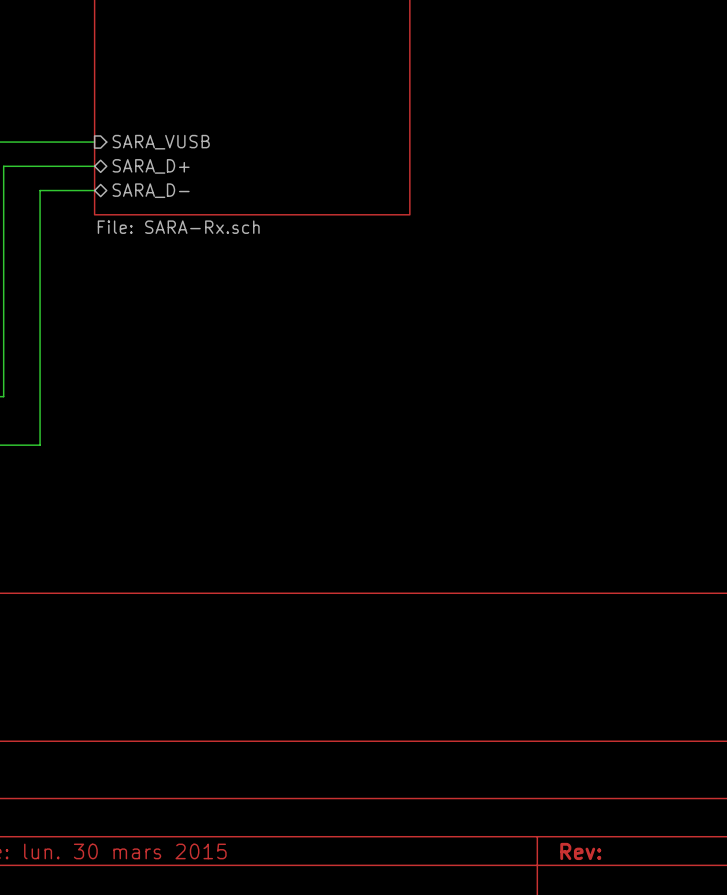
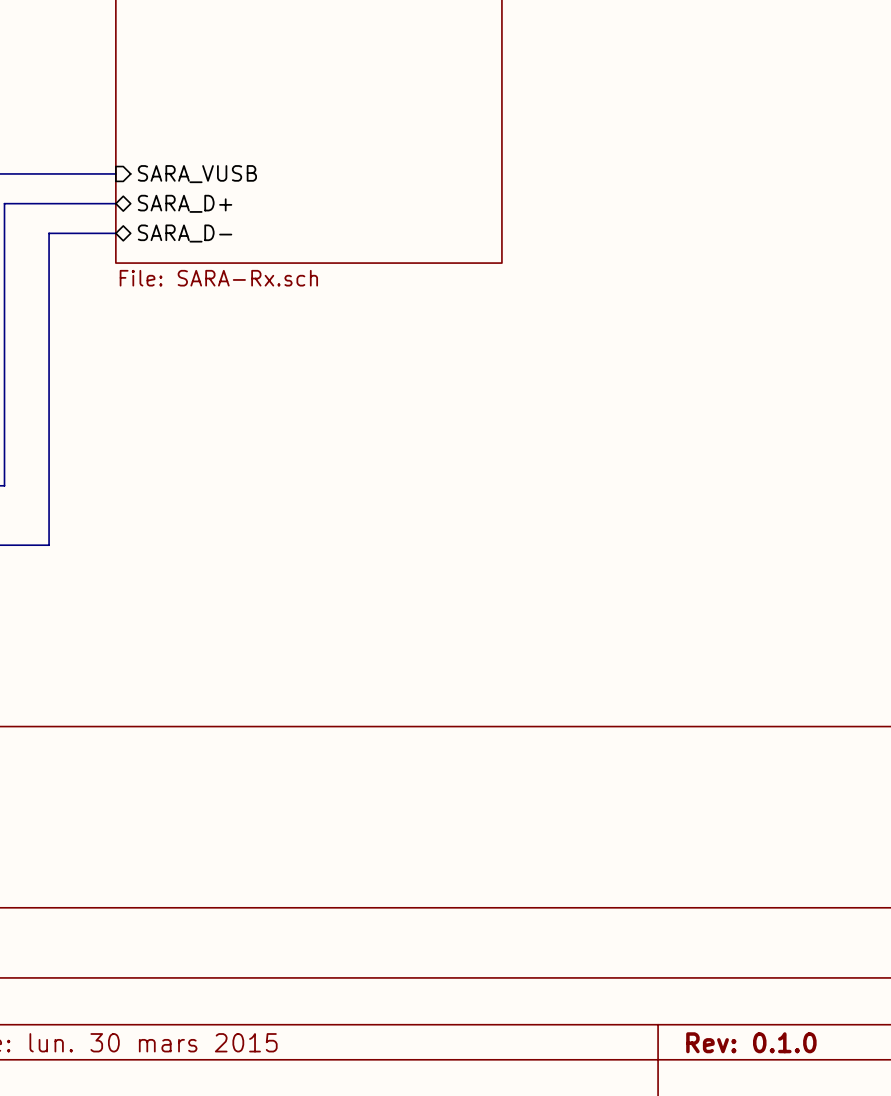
title block: Rev: (580, 851) -> Rev: 0.1.0 (751, 1042)

